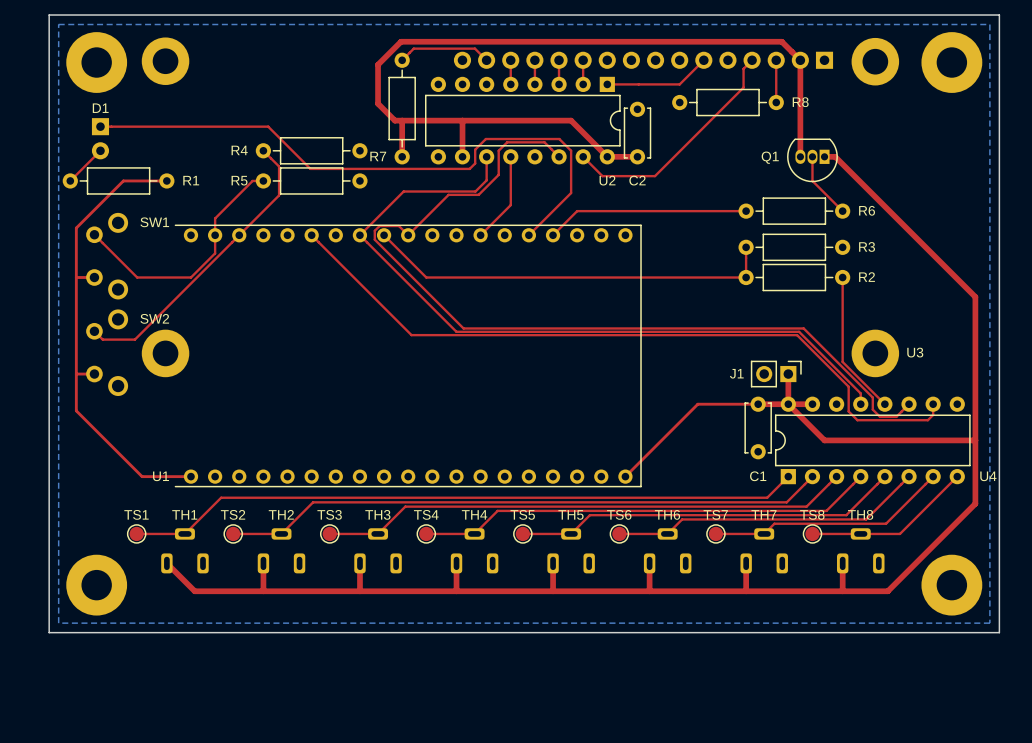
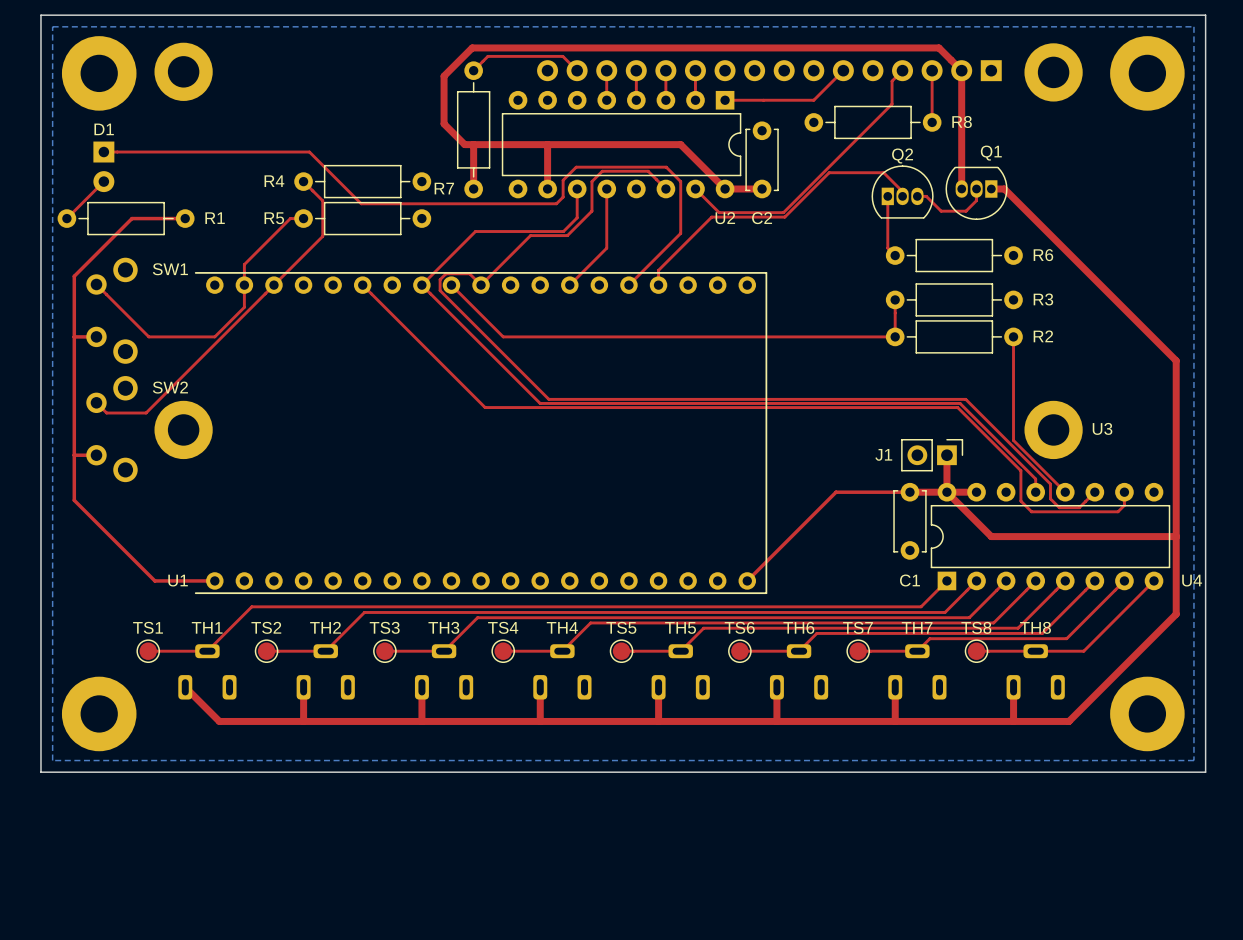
Q1 name position: Q1 (770, 157) -> Q1 (991, 153)
Q2: none -> (902, 192)
top track: none -> (887, 196) (887, 248) (895, 255)
top track: (812, 166) (812, 180) (842, 211) -> (976, 200) (965, 211) (941, 211) (926, 196) (917, 196)
top track: (746, 211) (577, 211) (553, 235) -> (902, 196) (902, 191) (883, 172) (829, 172) (784, 217) (711, 217) (658, 270) (658, 285)

